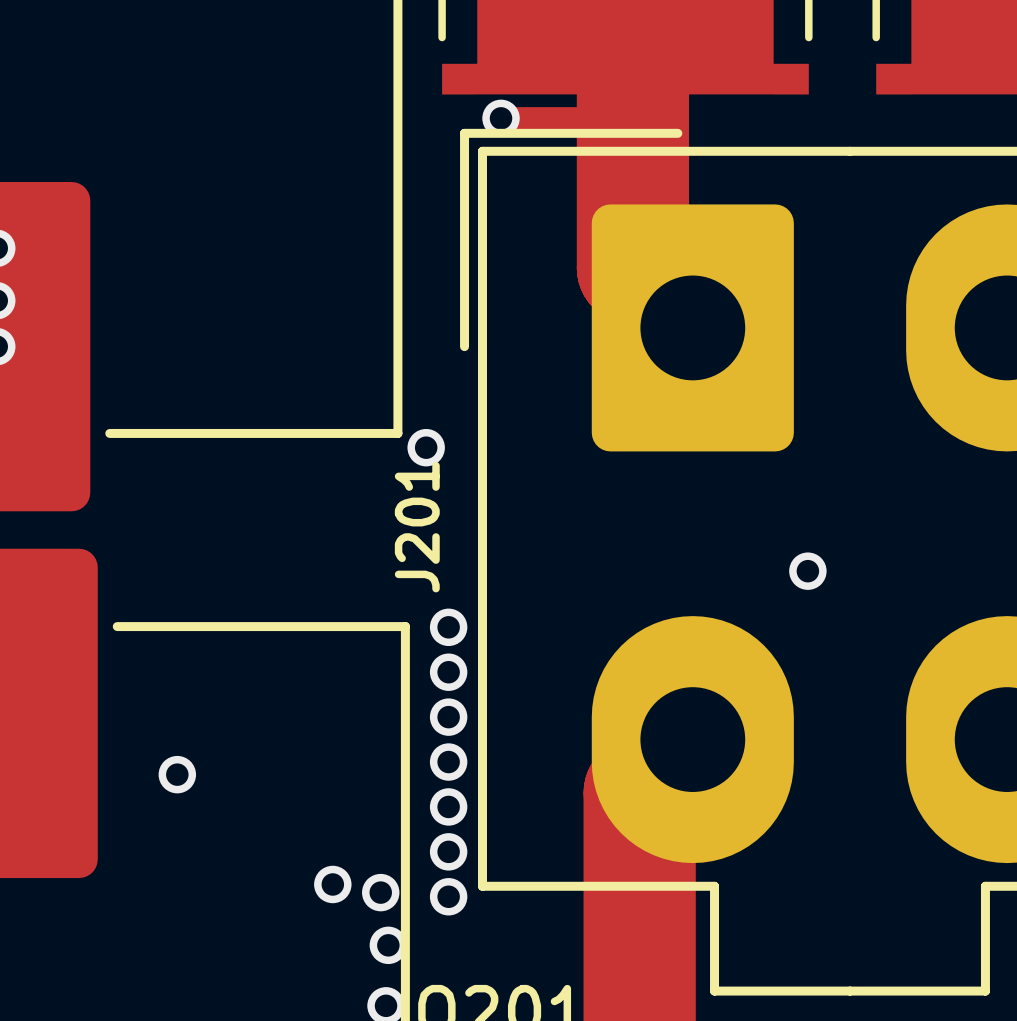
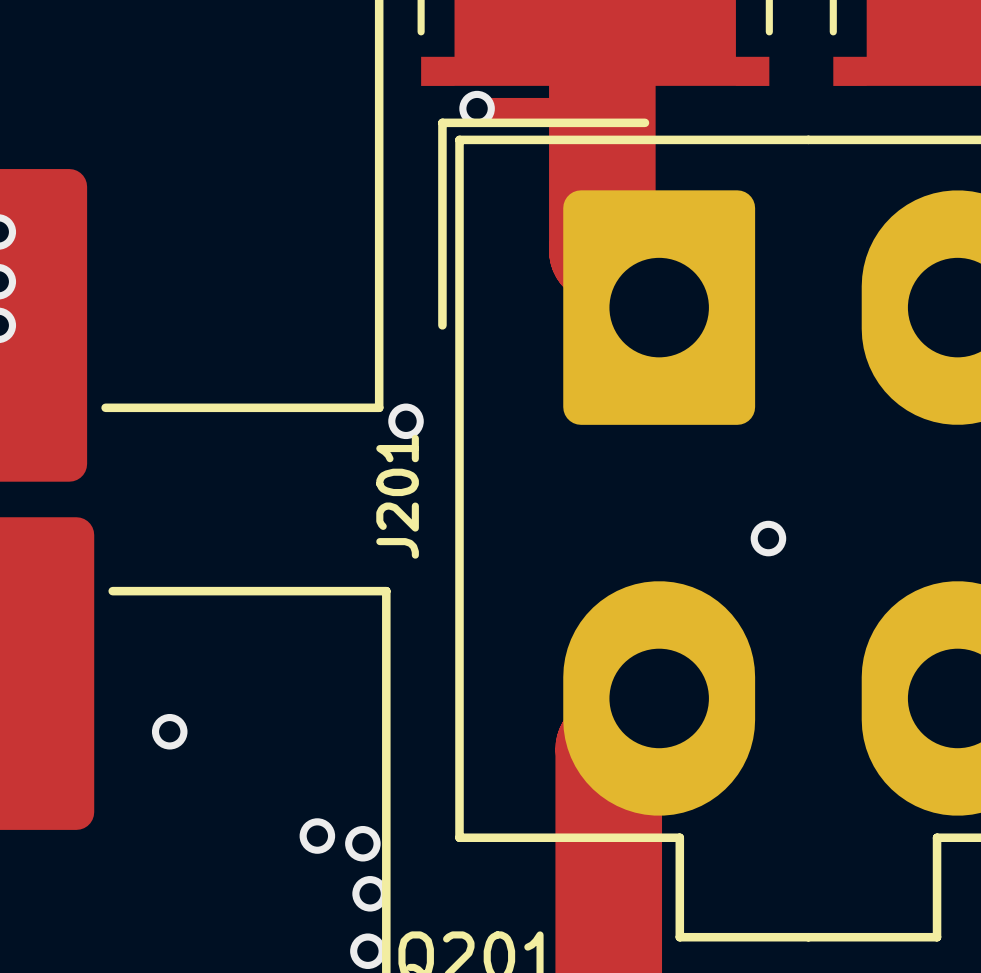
via: (448, 627) -> none
via: (448, 672) -> none
via: (448, 717) -> none
via: (448, 762) -> none
via: (448, 806) -> none
via: (448, 851) -> none
via: (448, 896) -> none

